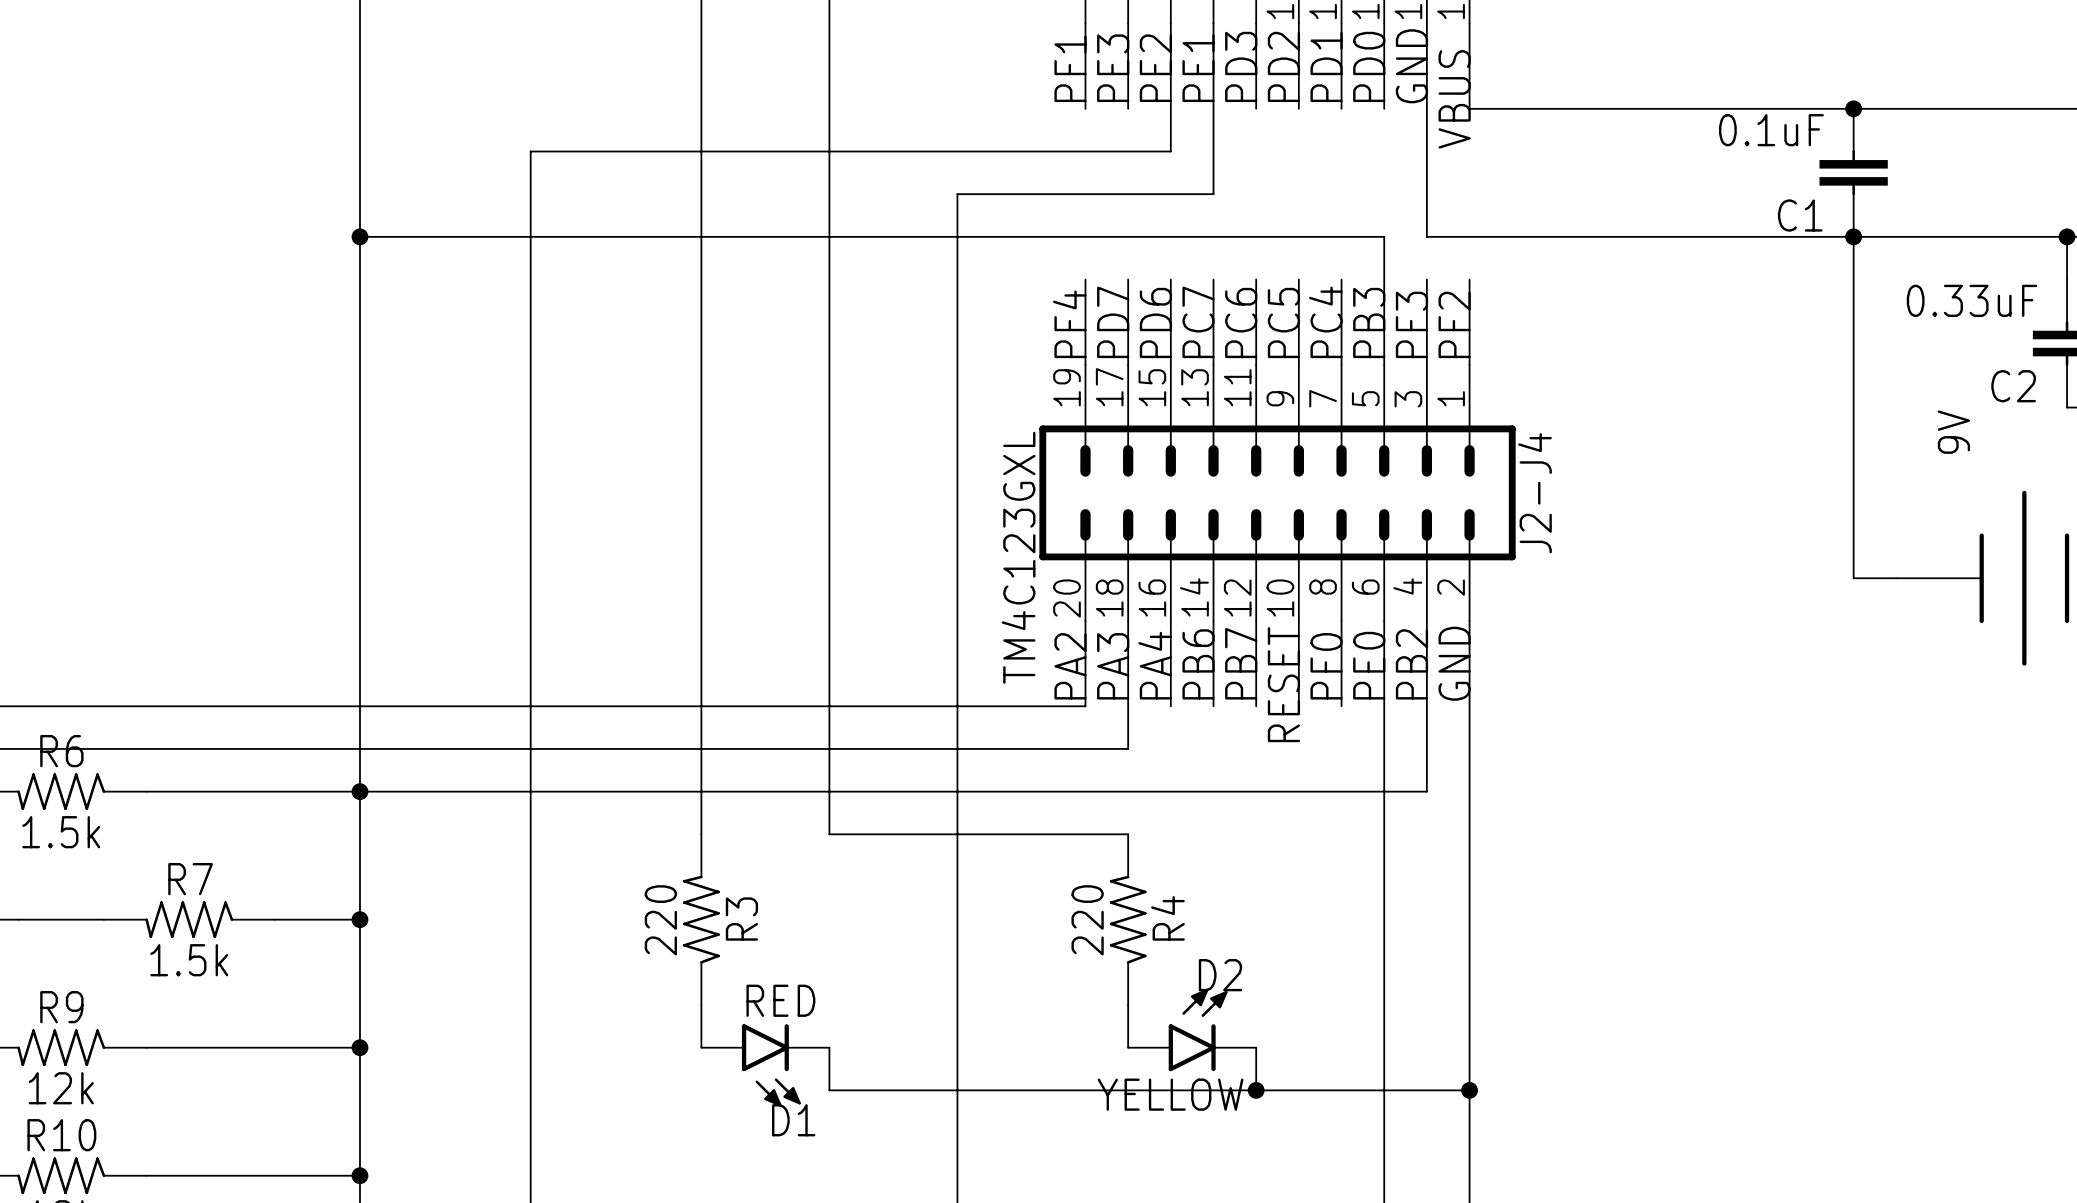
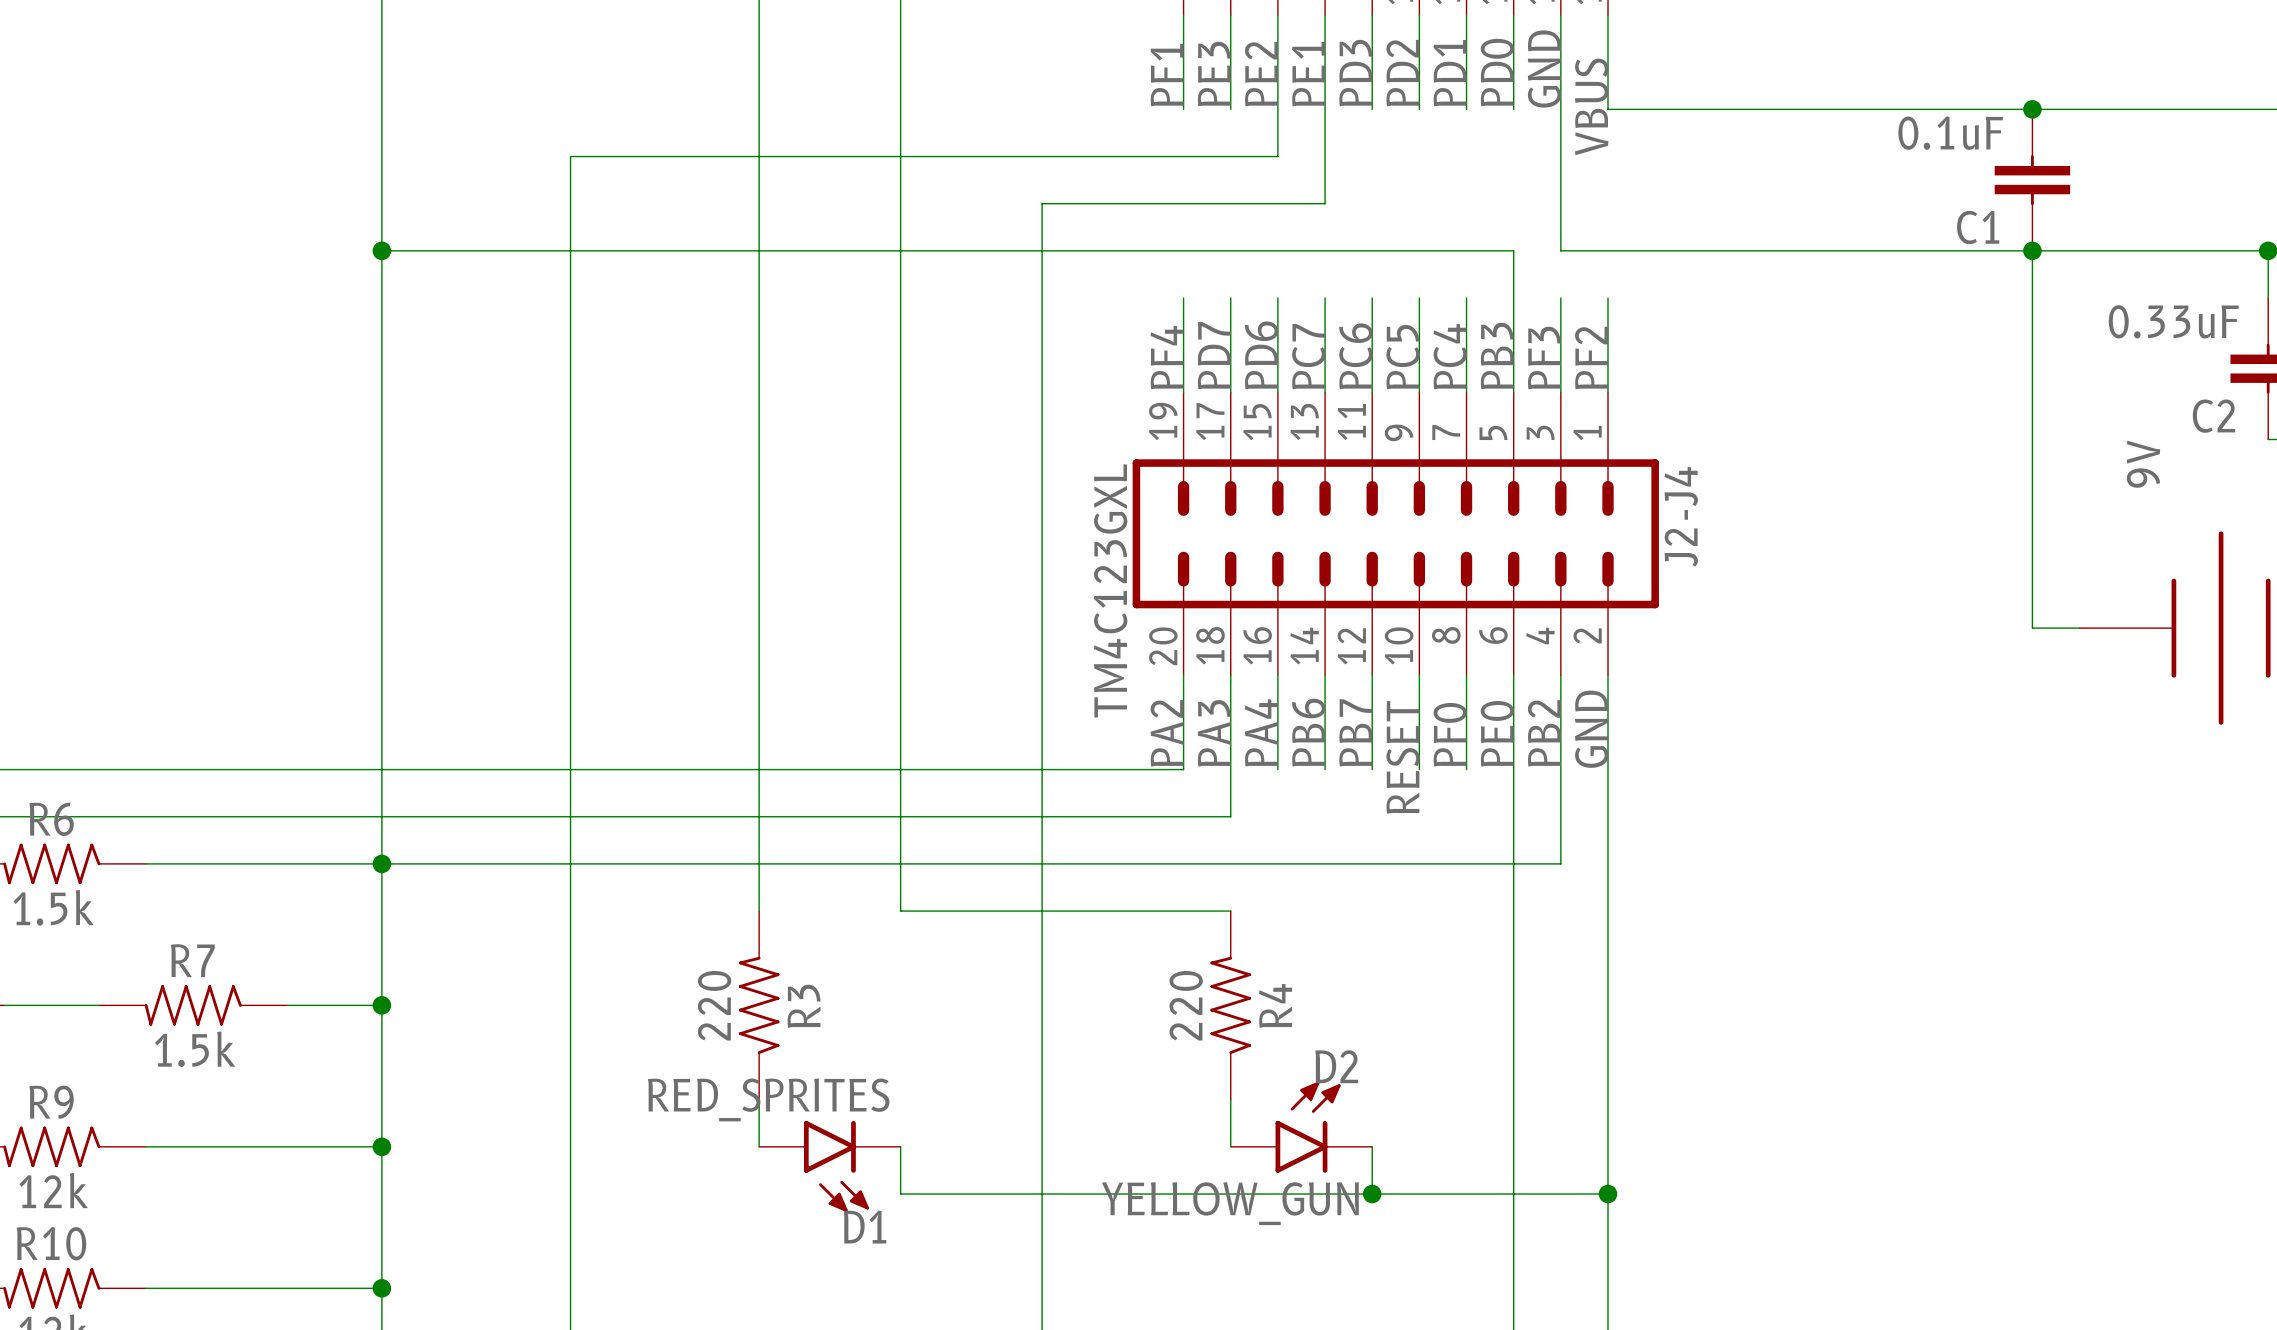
D1 value: RED (780, 1000) -> RED_SPRITES (768, 1099)
D2 value: YELLOW (1170, 1094) -> YELLOW_GUN (1230, 1203)

